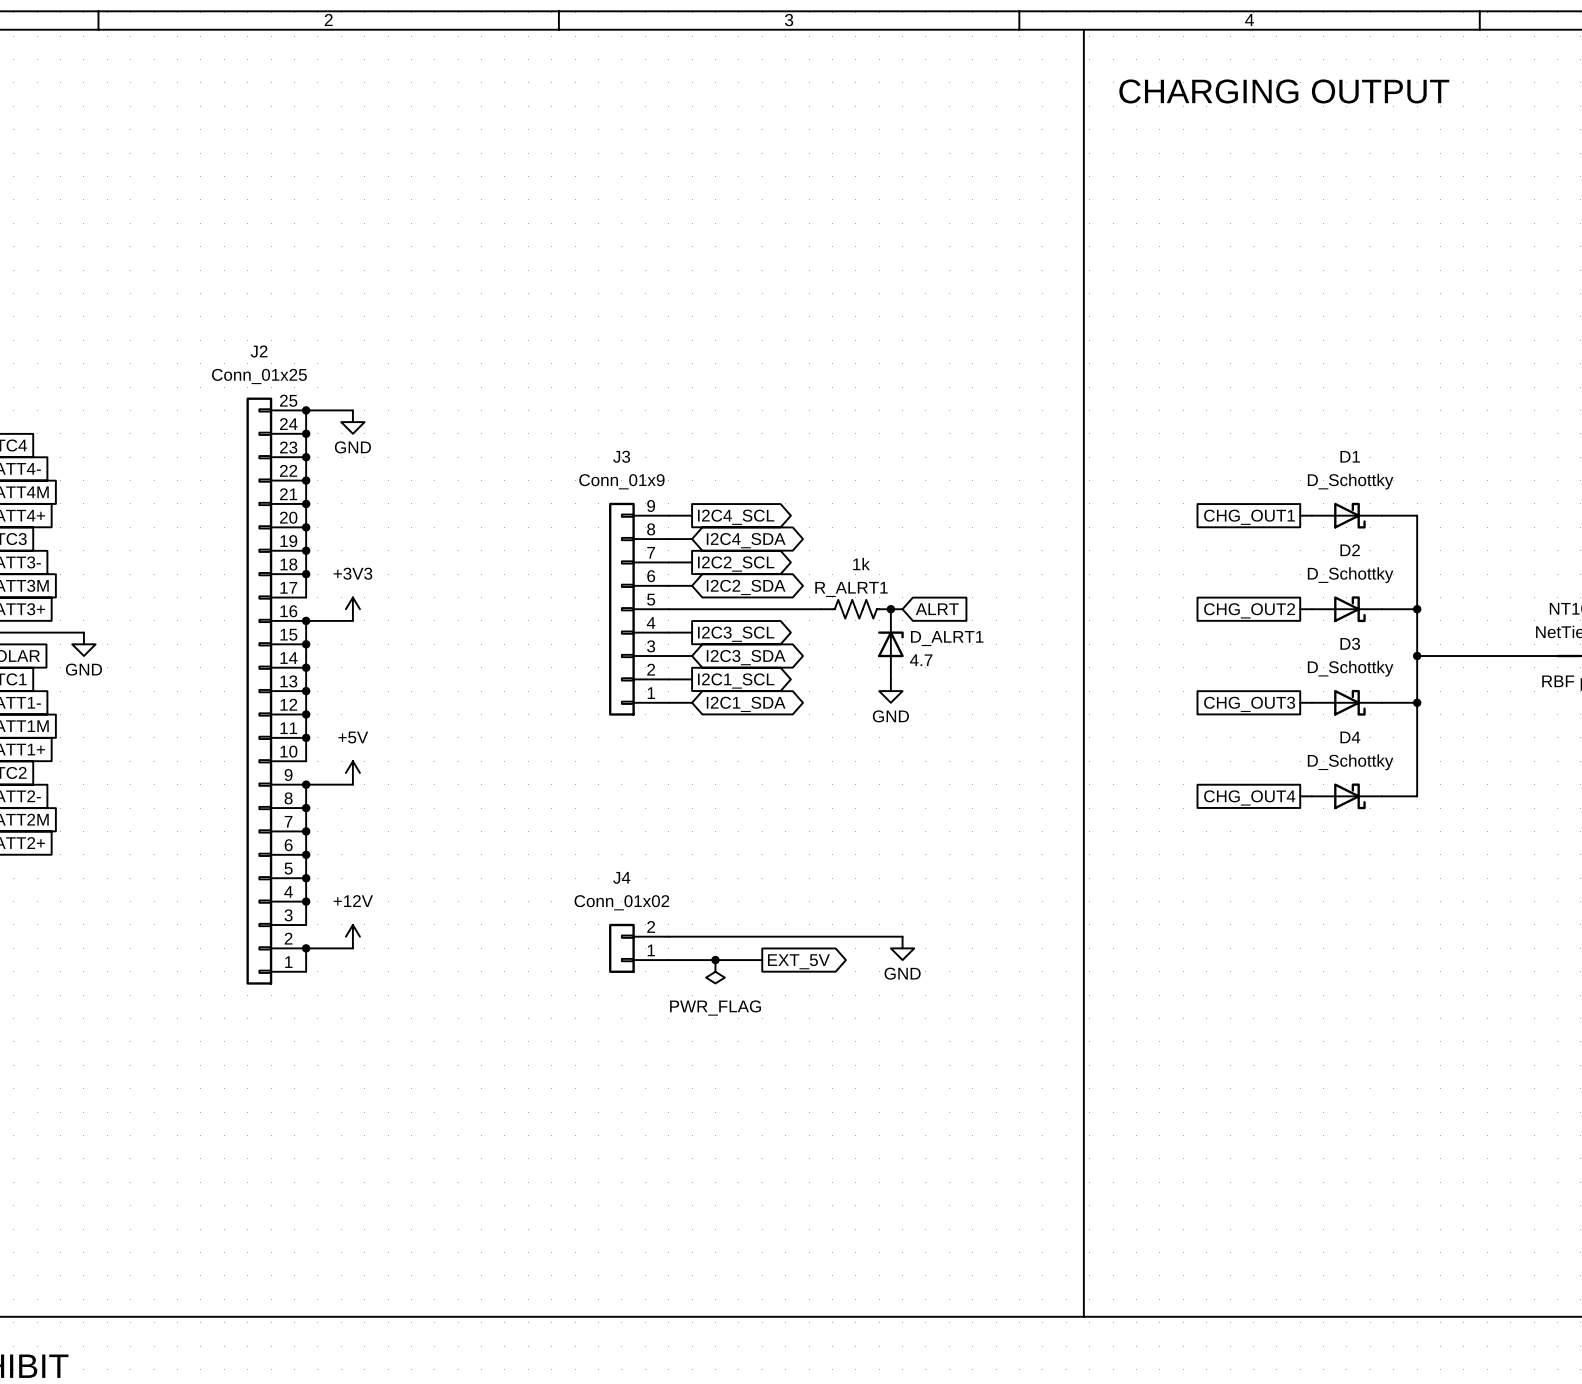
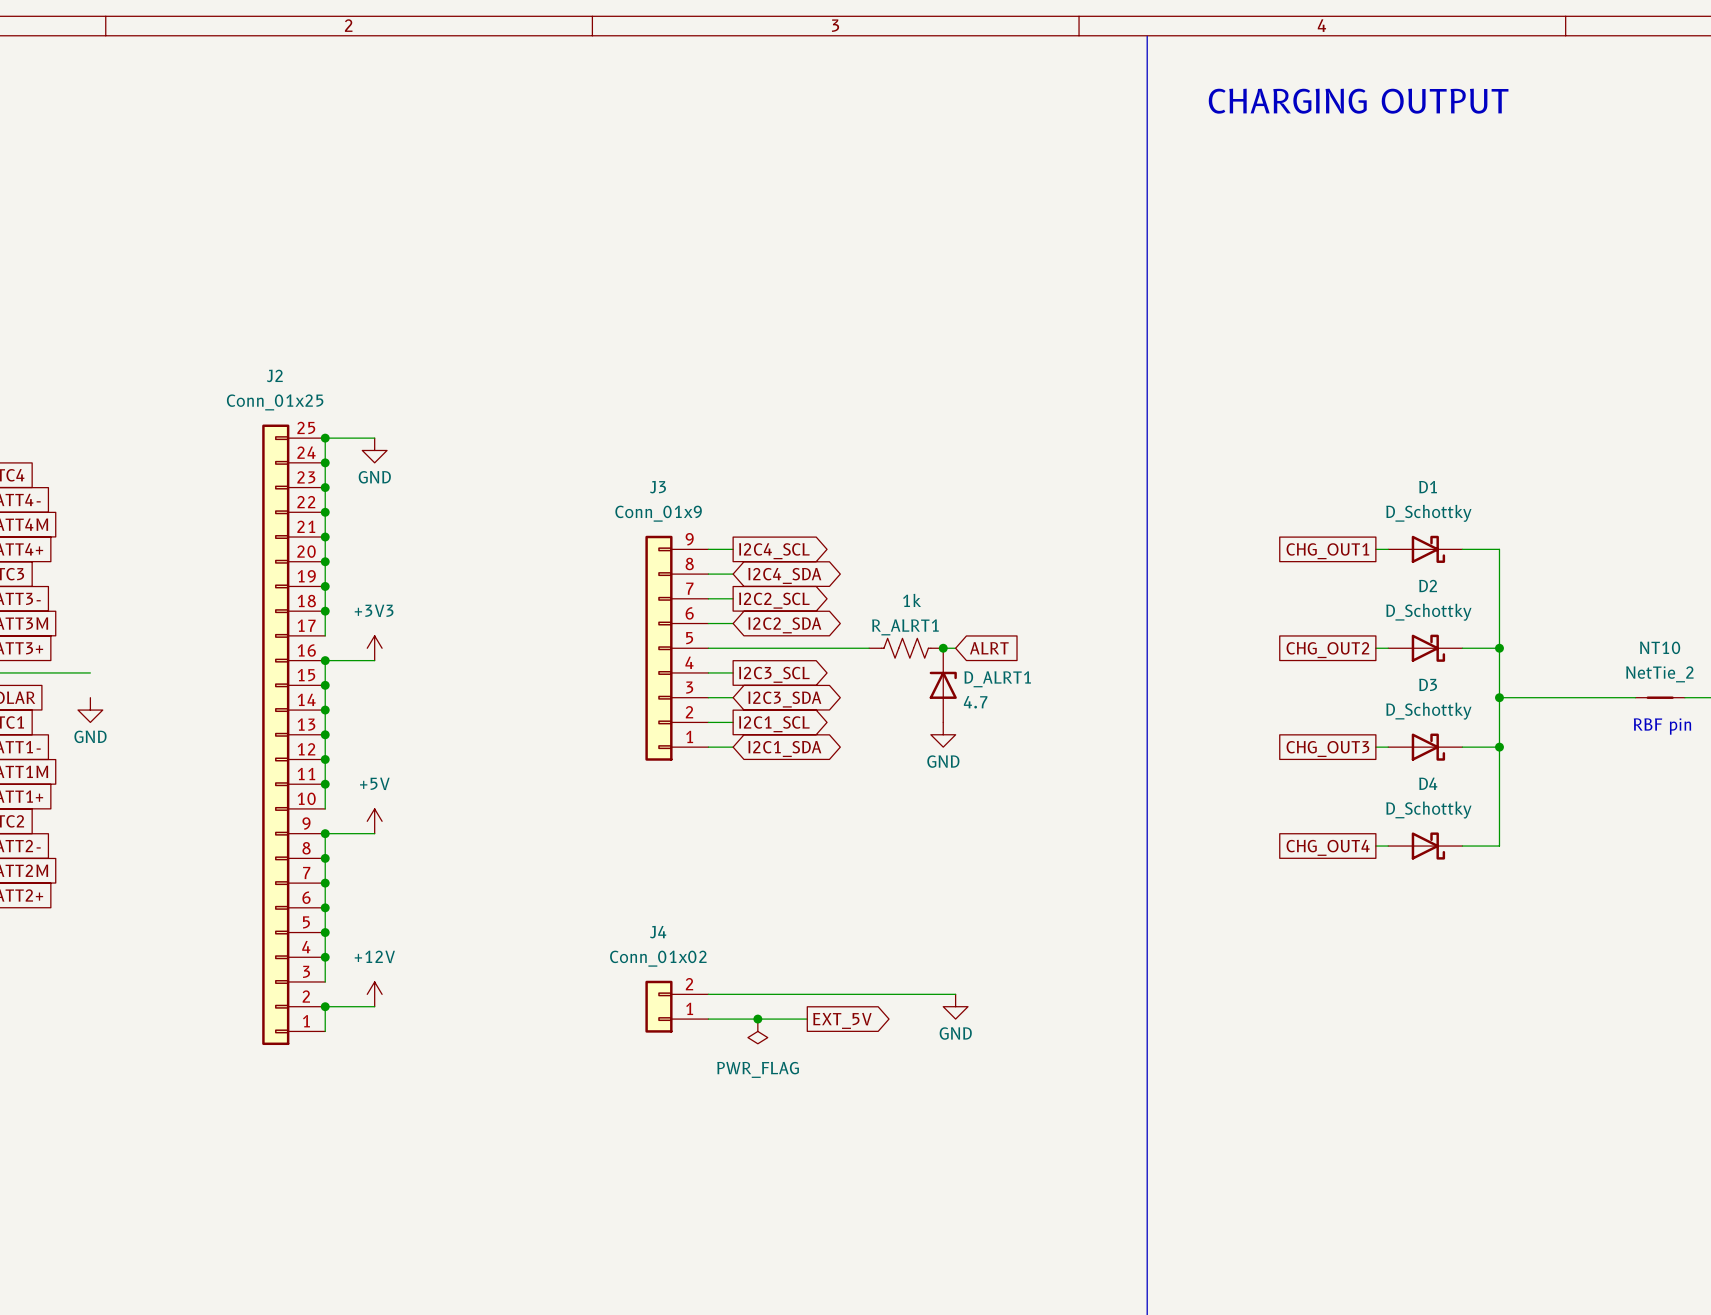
power symbol position: GND (83, 644) -> GND (90, 710)

